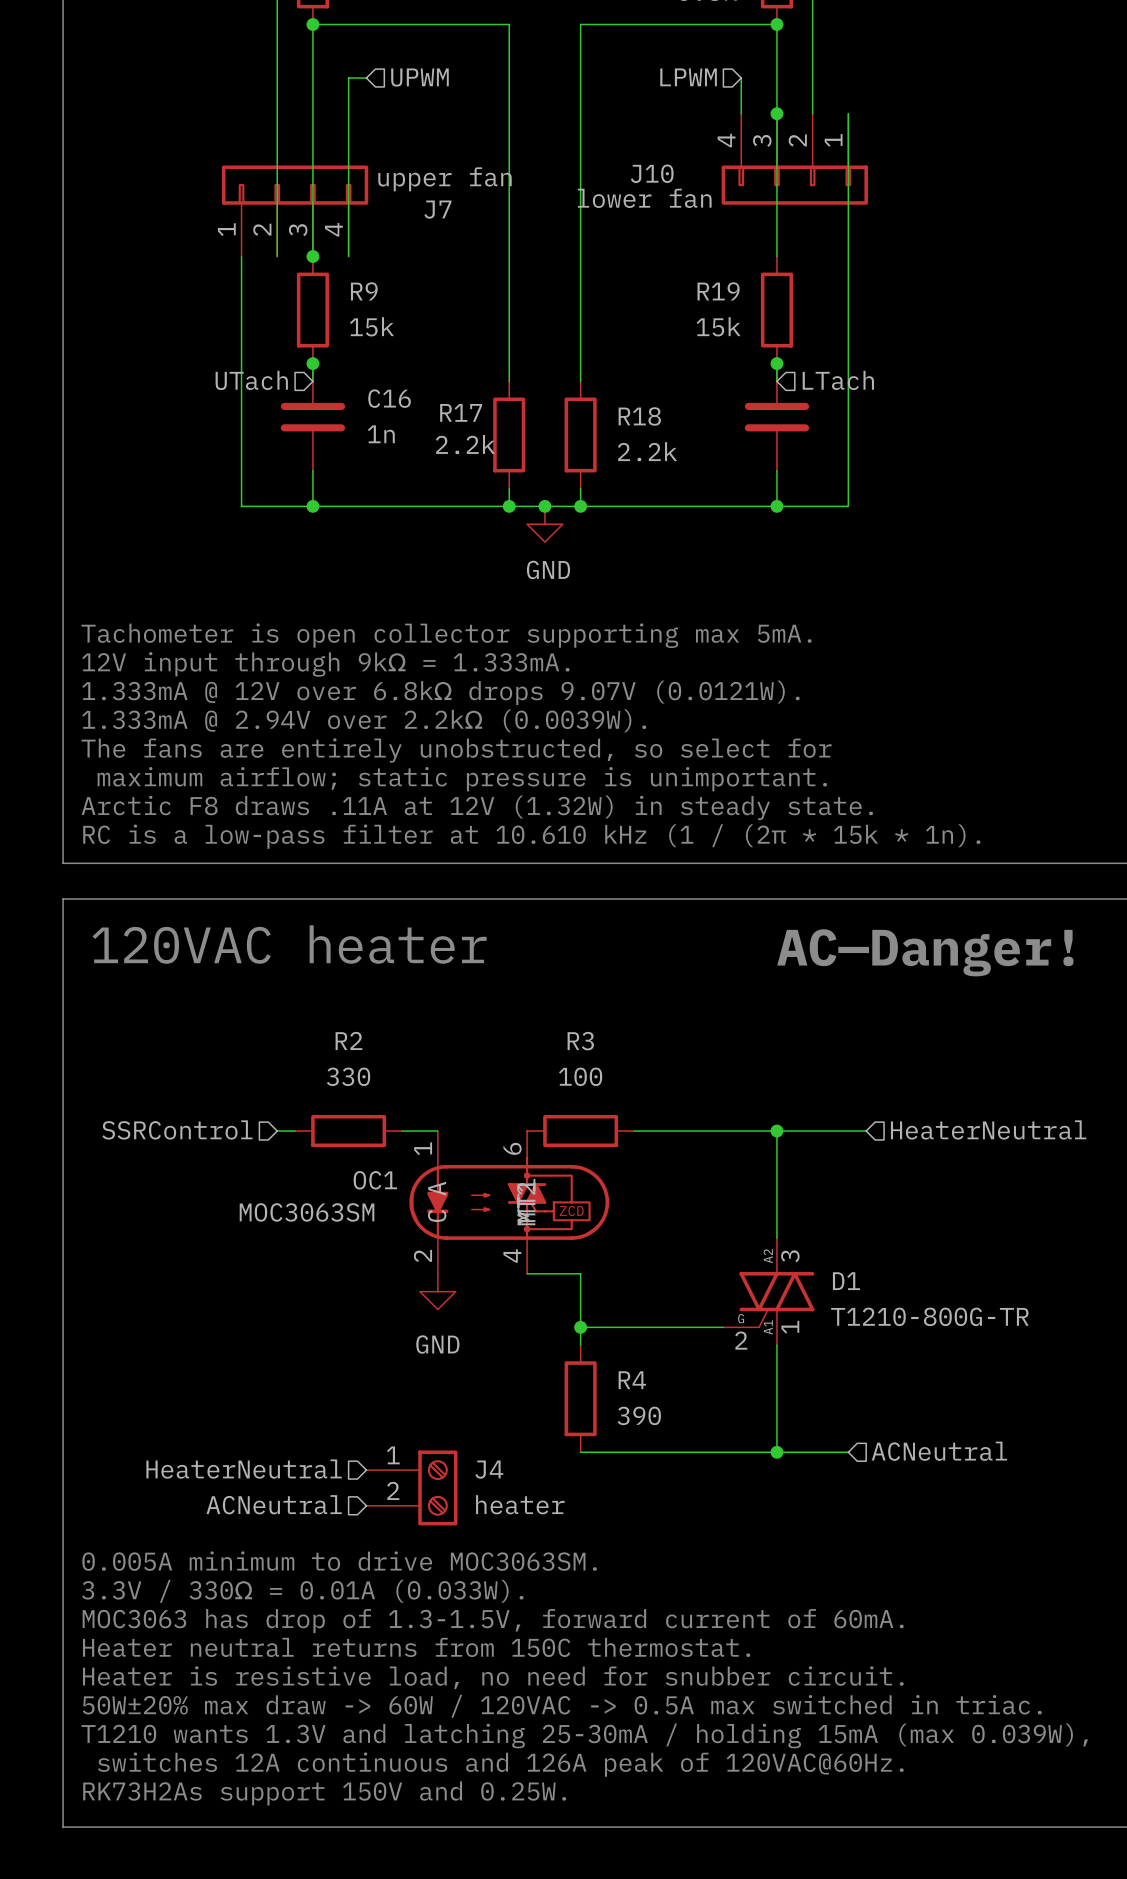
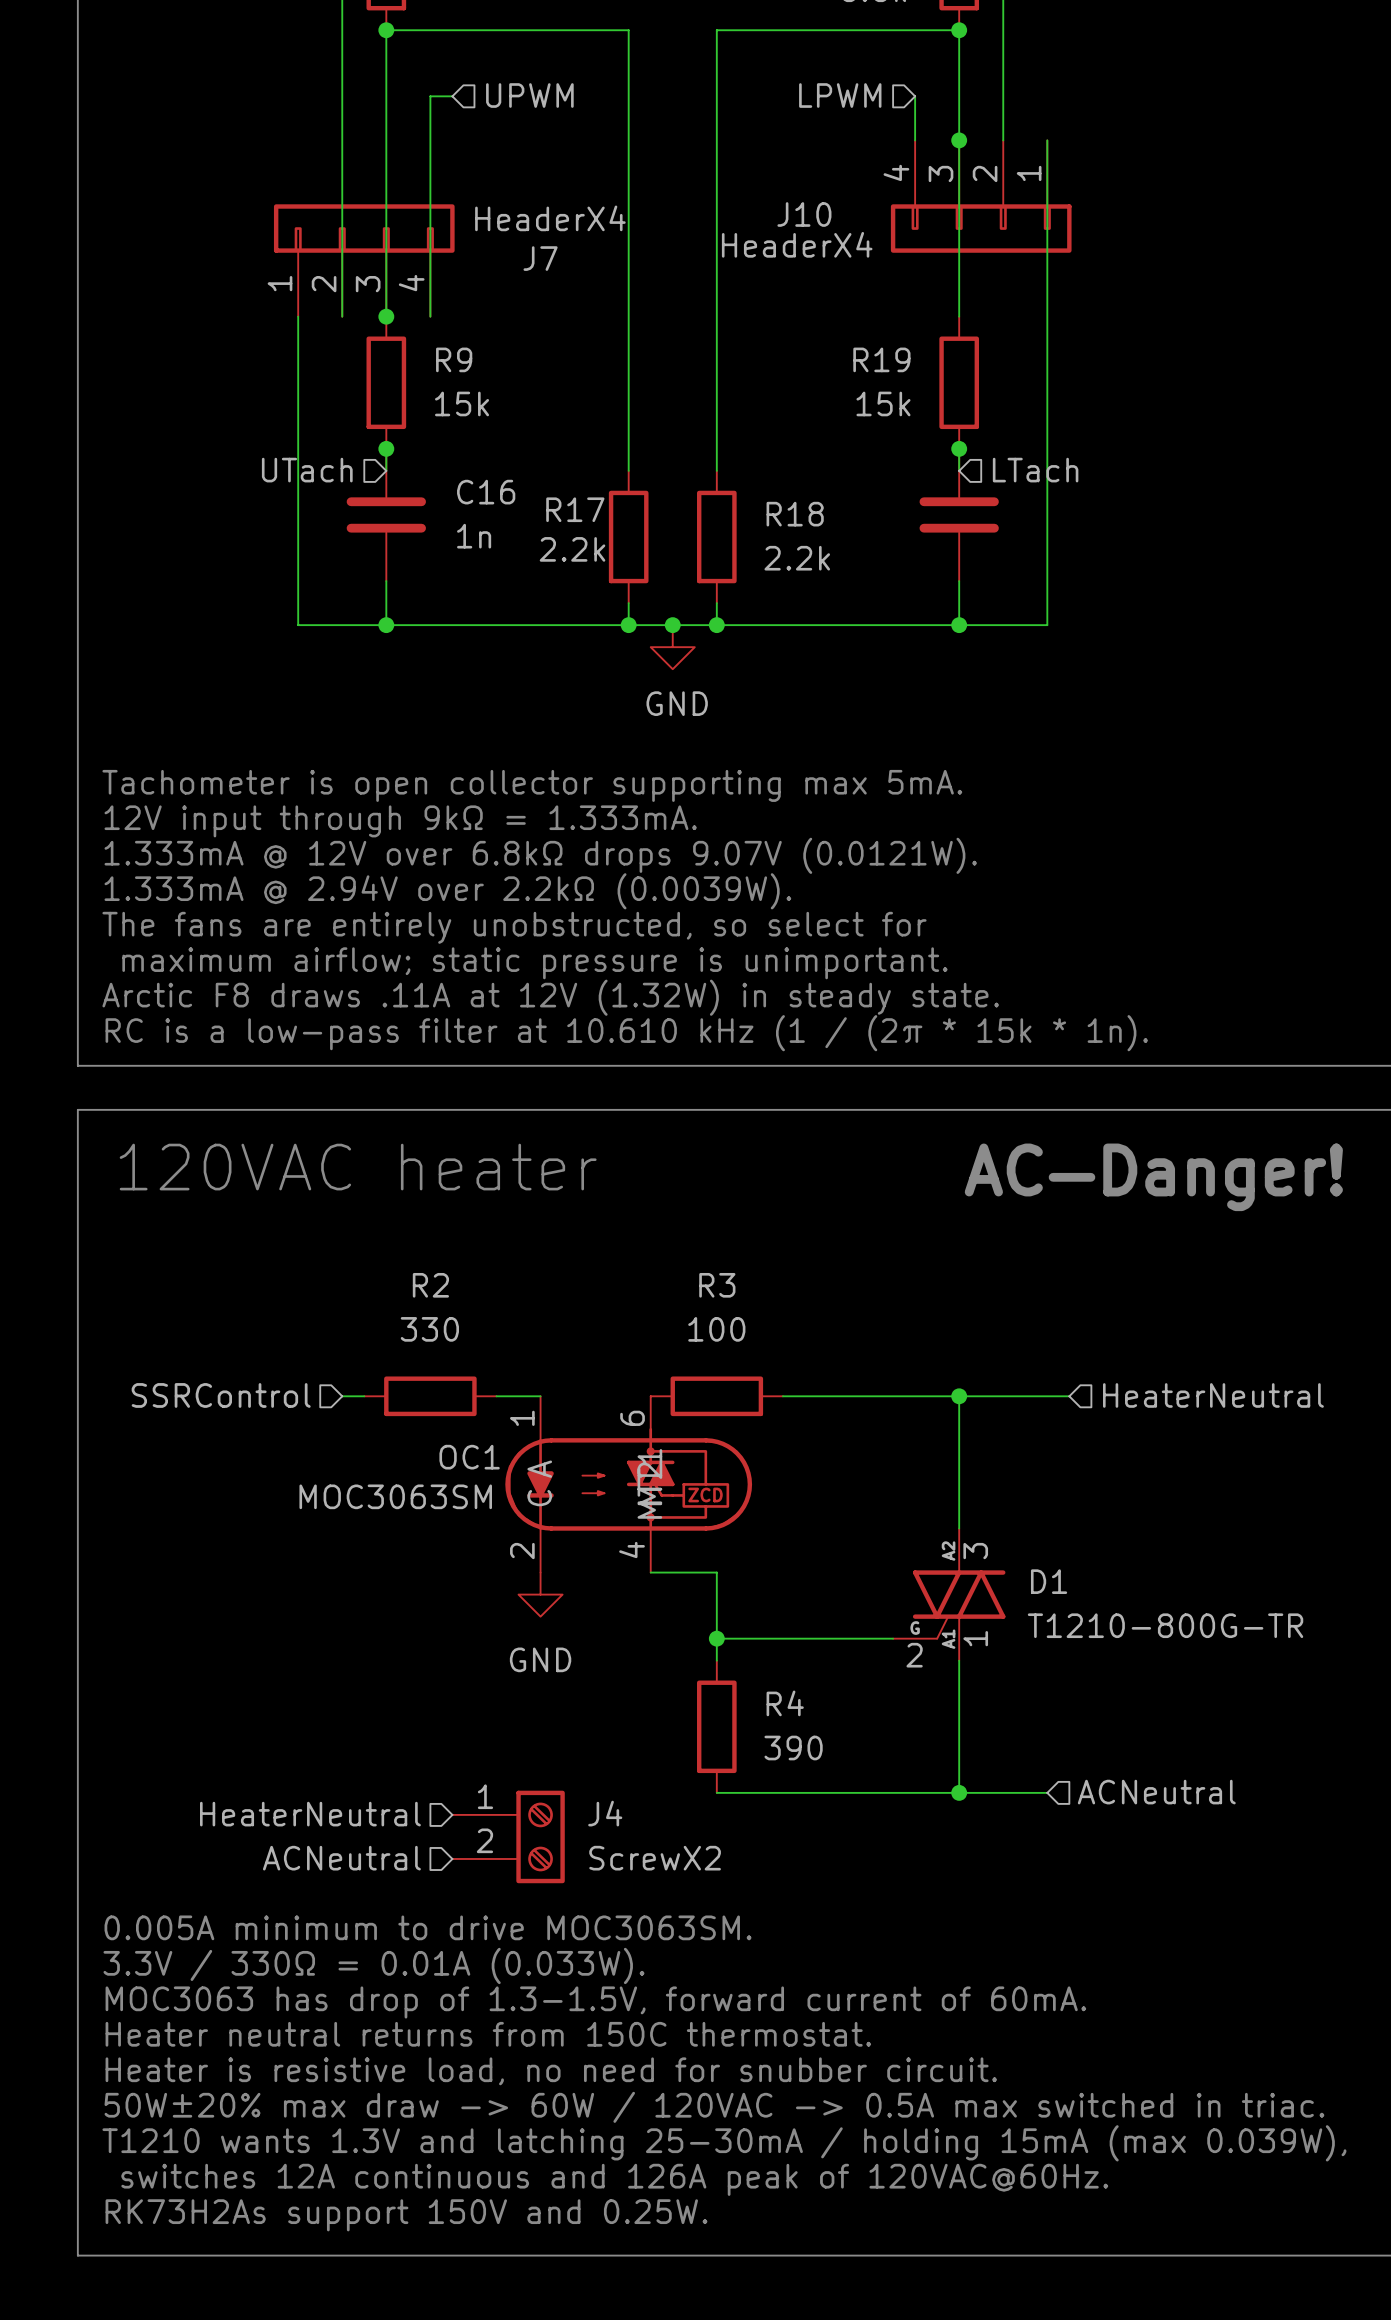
J7 value: upper fan (444, 179) -> HeaderX4 (550, 218)
J10 value: lower fan (644, 198) -> HeaderX4 (797, 244)
J4 value: heater (520, 1504) -> ScrewX2 (655, 1858)

